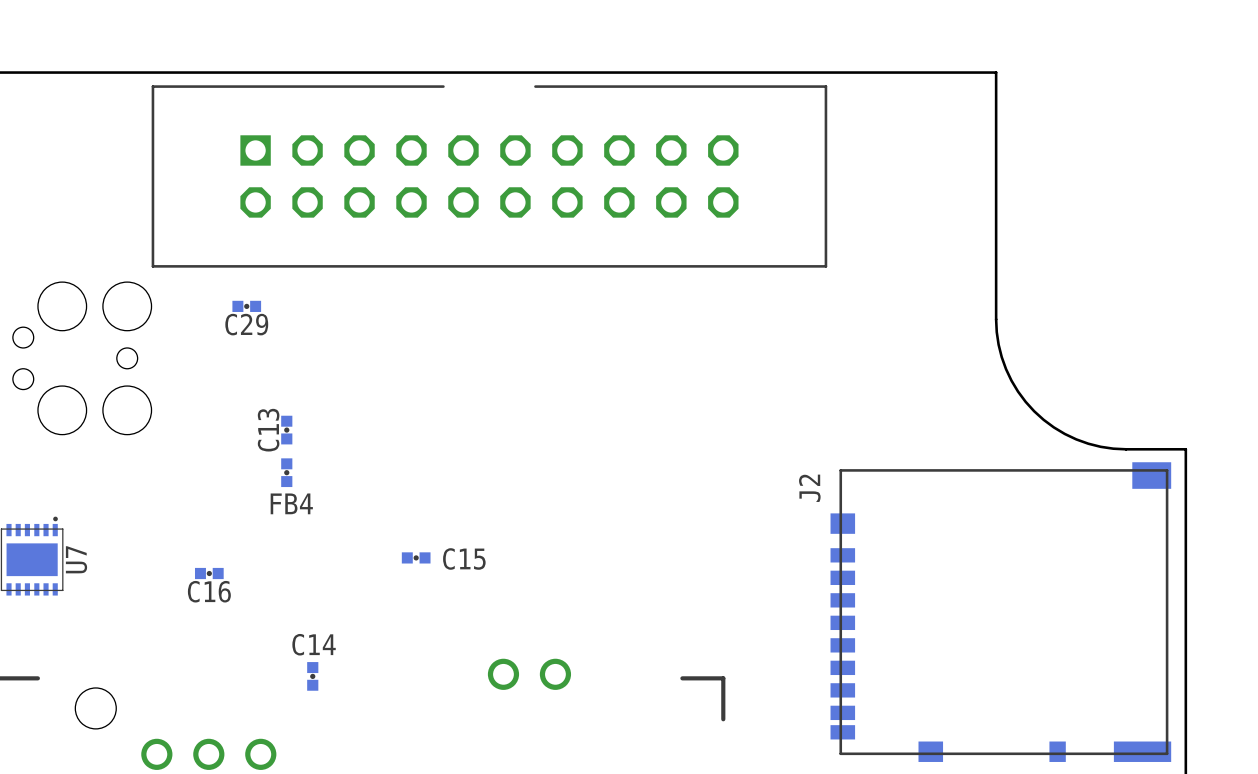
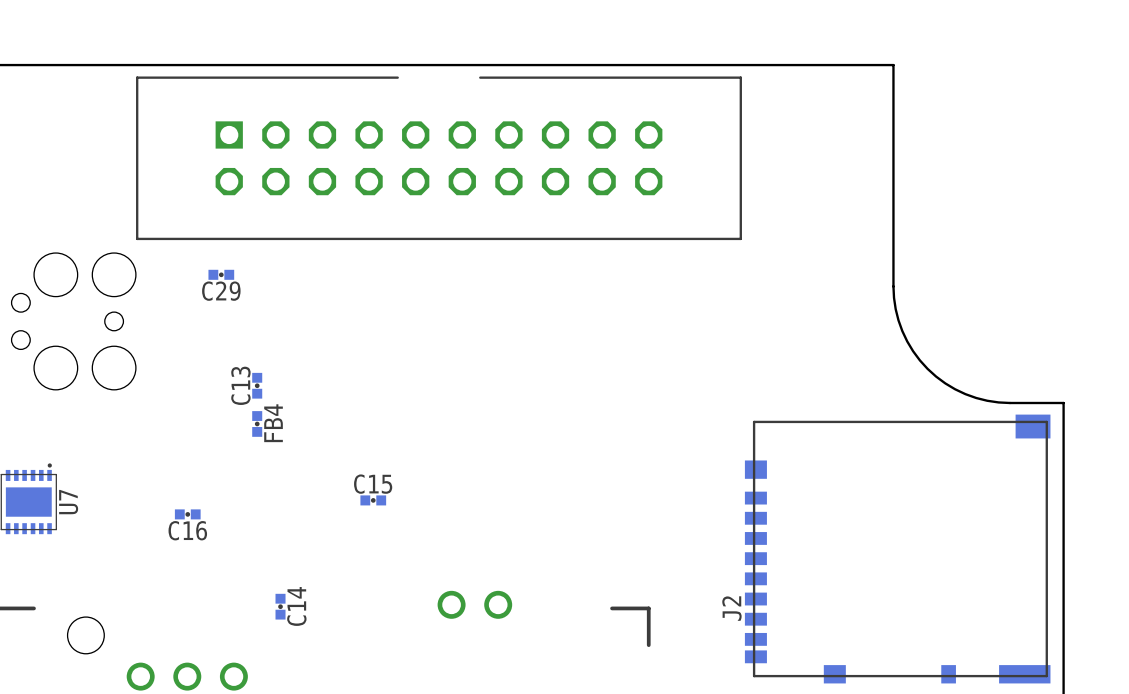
J2 name position: J2 (809, 488) -> J2 (731, 608)
FB4 name rotation: 0° (291, 503) -> 90° counterclockwise (273, 423)
C15 name position: C15 (464, 558) -> C15 (373, 484)
C14 name rotation: 0° (314, 644) -> 90° counterclockwise (296, 606)

